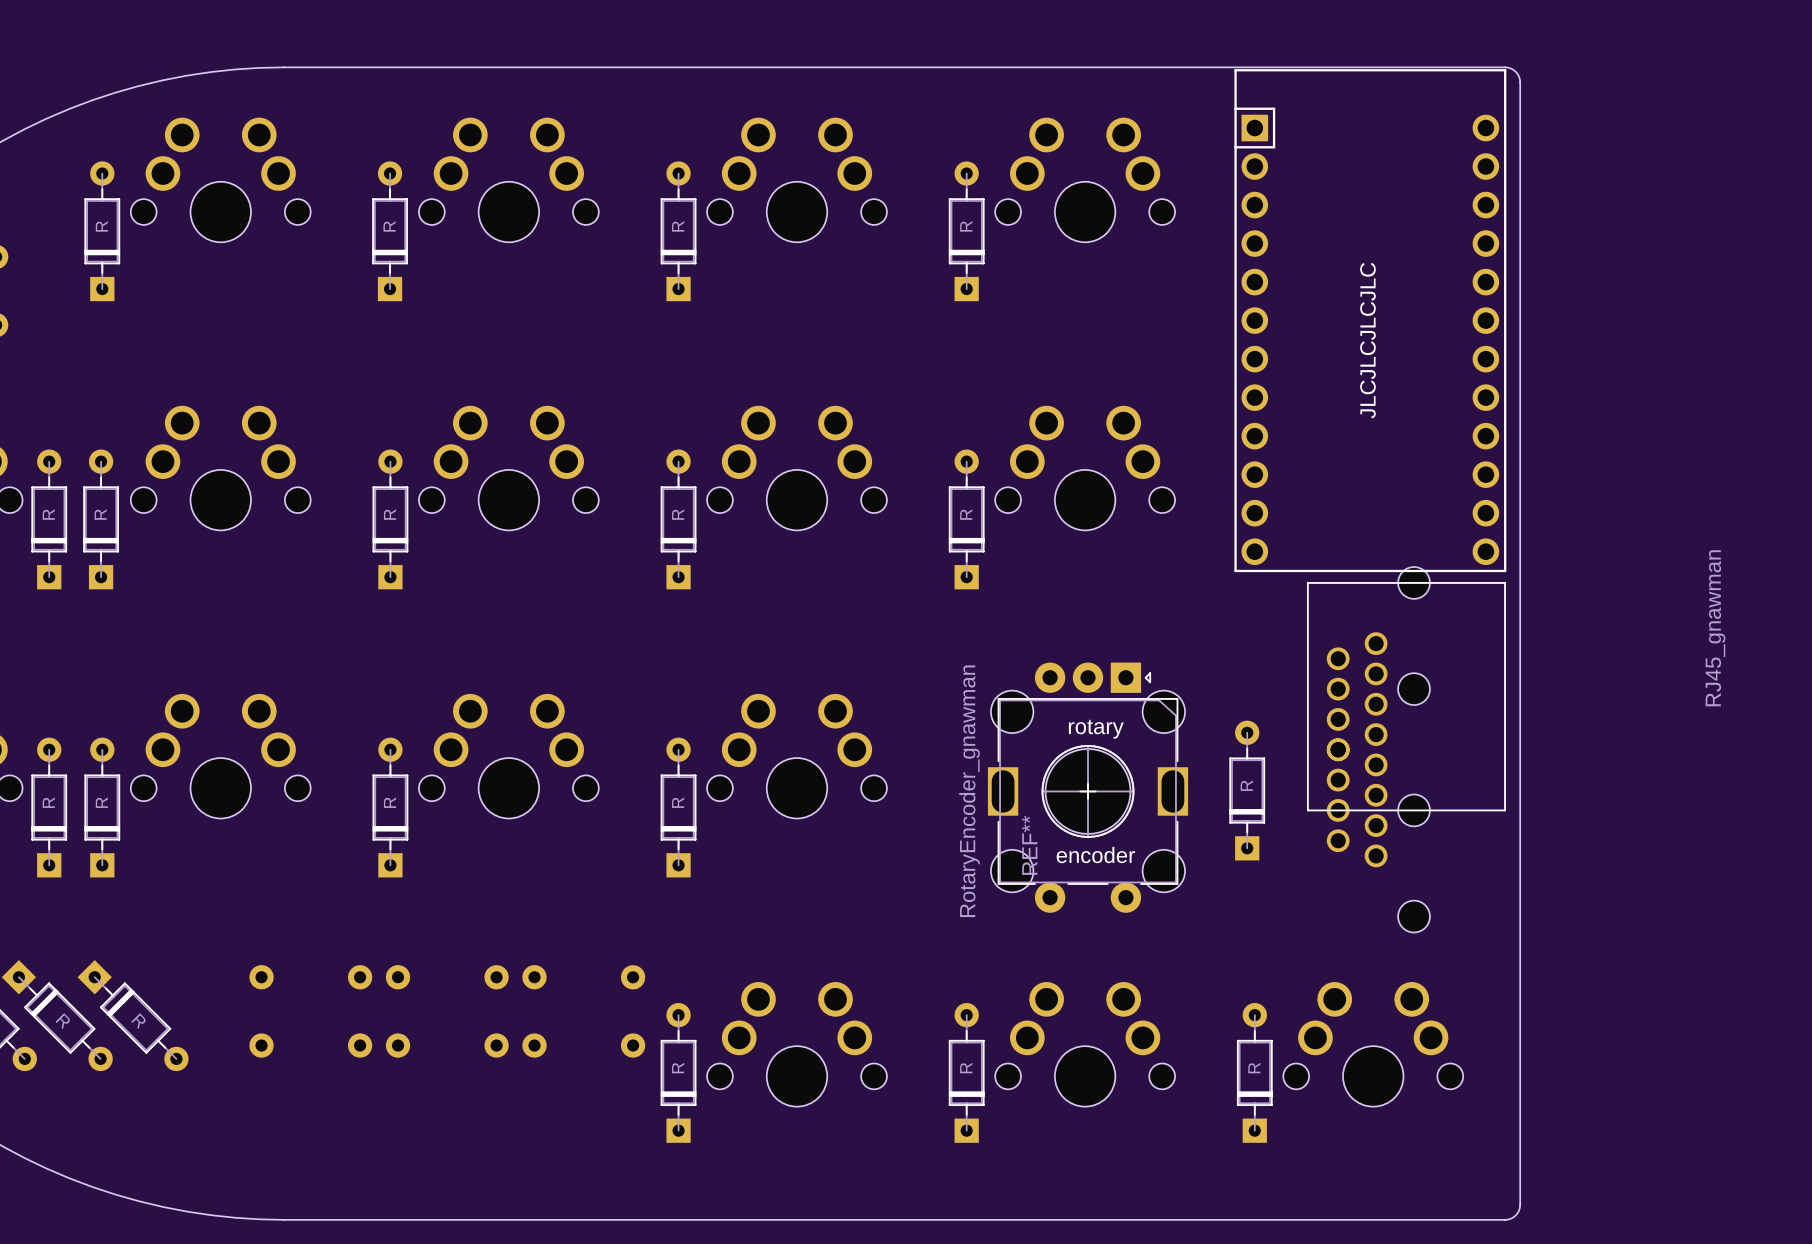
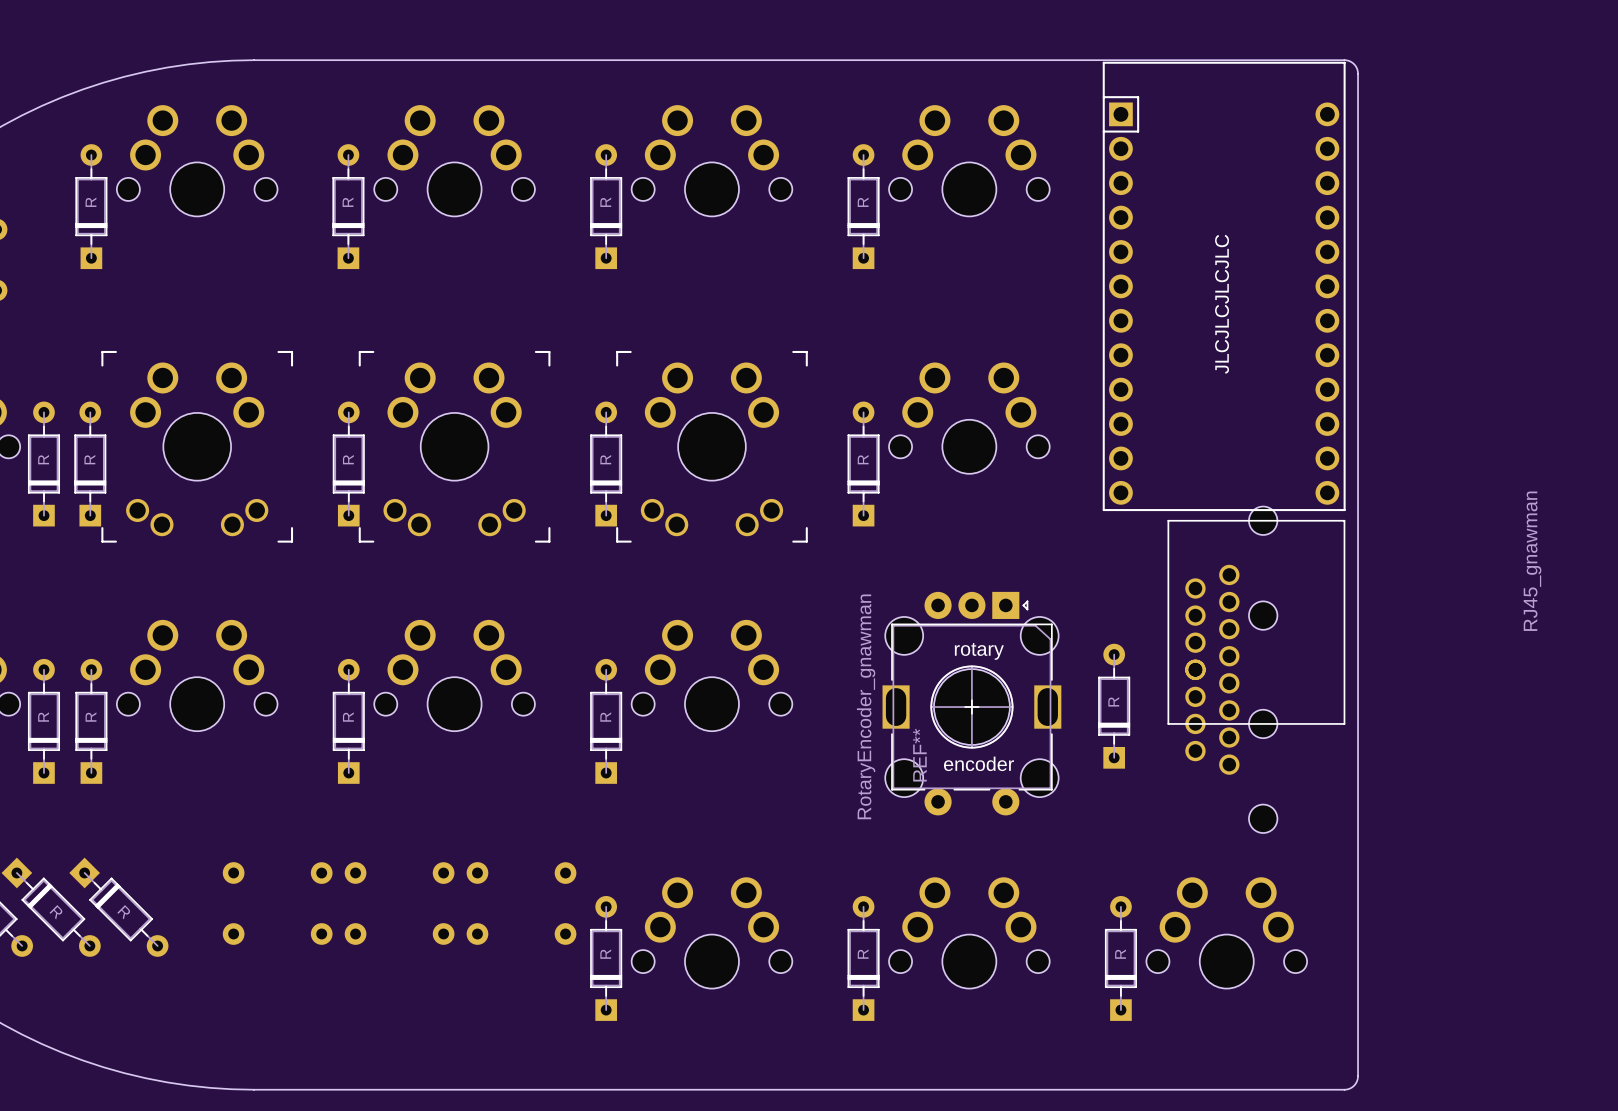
part: (220, 468) -> none
part: (508, 468) -> none
part: (796, 468) -> none
part: none -> (197, 446)
part: none -> (454, 446)
part: none -> (711, 446)

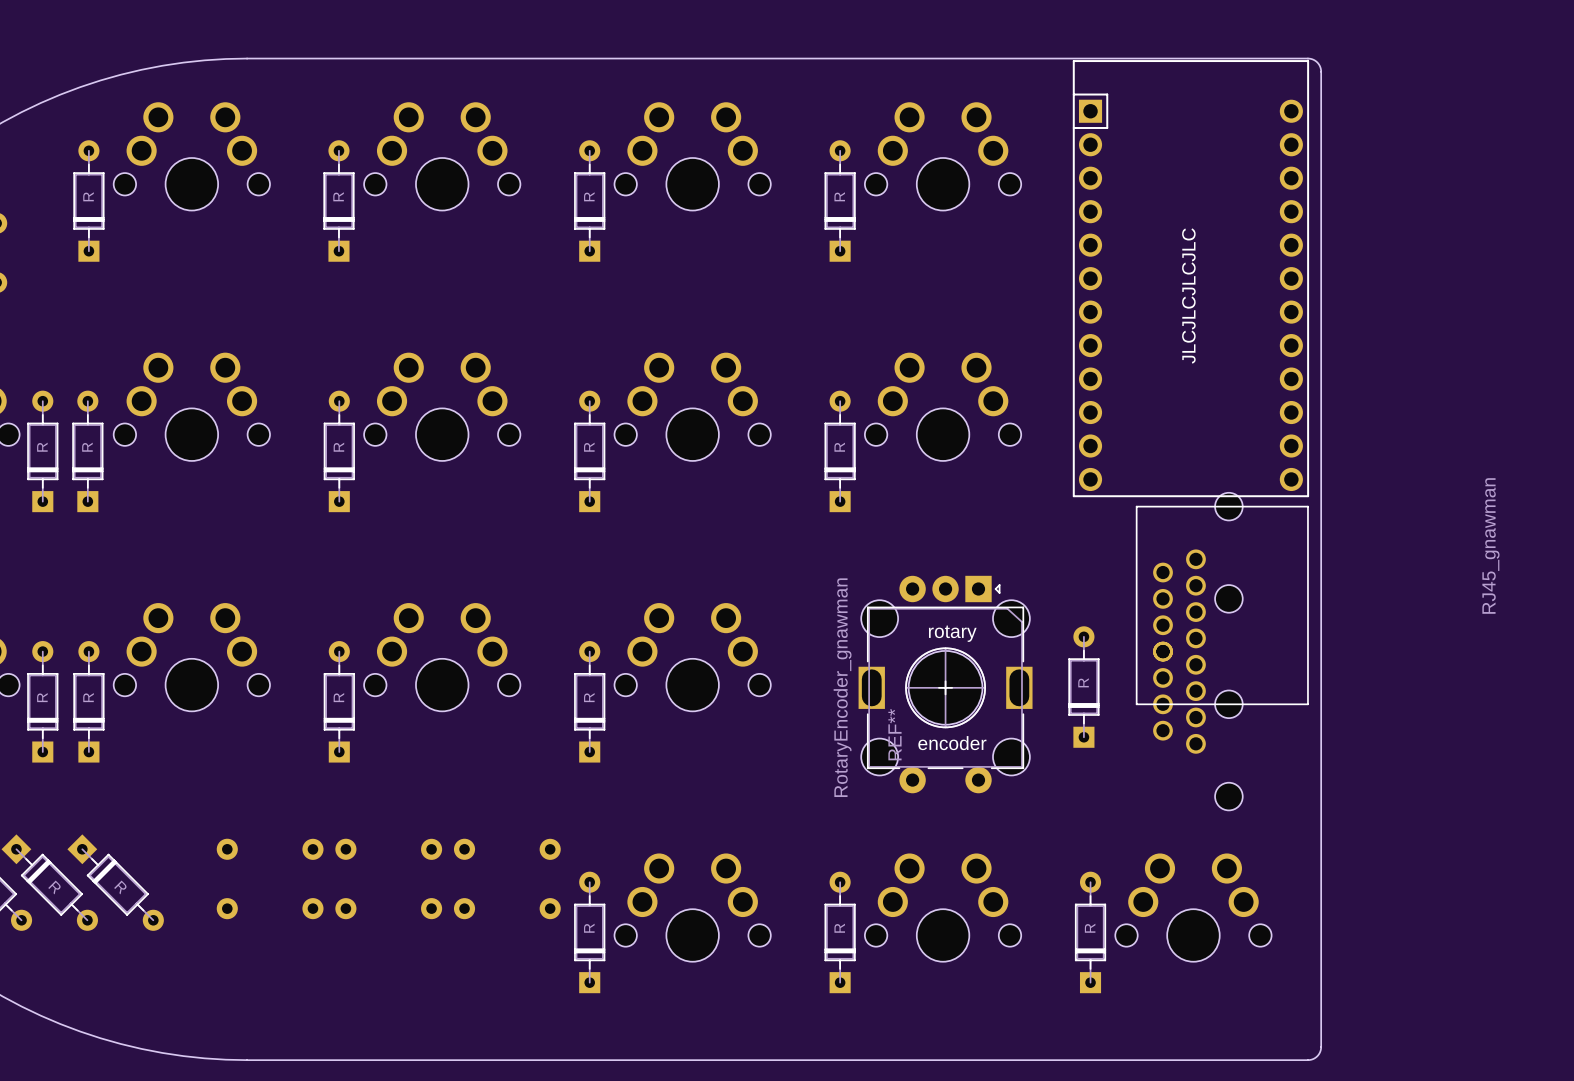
part: none -> (191, 406)
part: none -> (442, 406)
part: none -> (692, 406)
part: (197, 446) -> none
part: (454, 446) -> none
part: (711, 446) -> none

